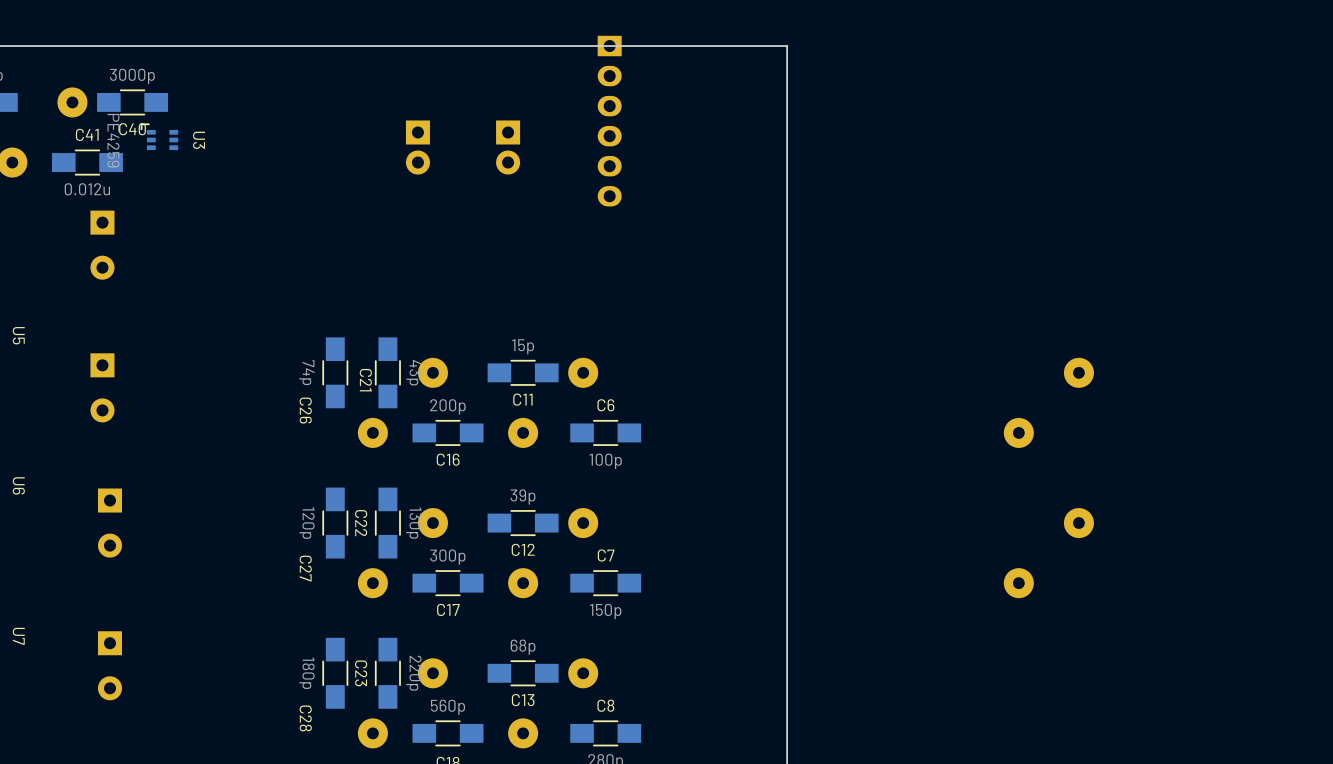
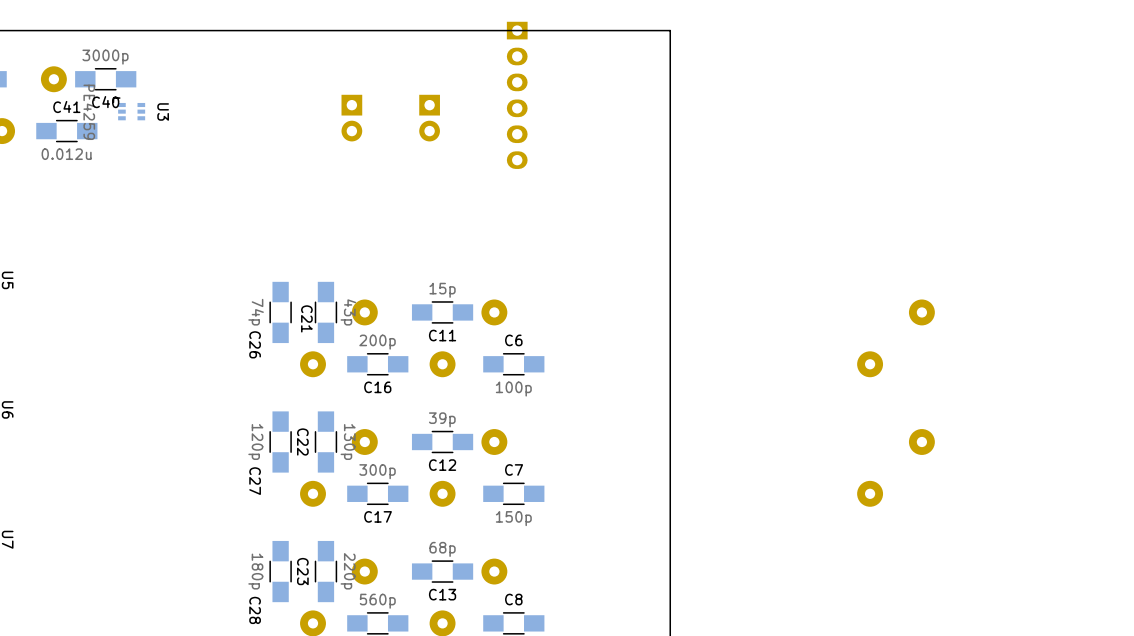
part: (102, 245) -> none
part: (102, 387) -> none
part: (109, 523) -> none
part: (109, 665) -> none

